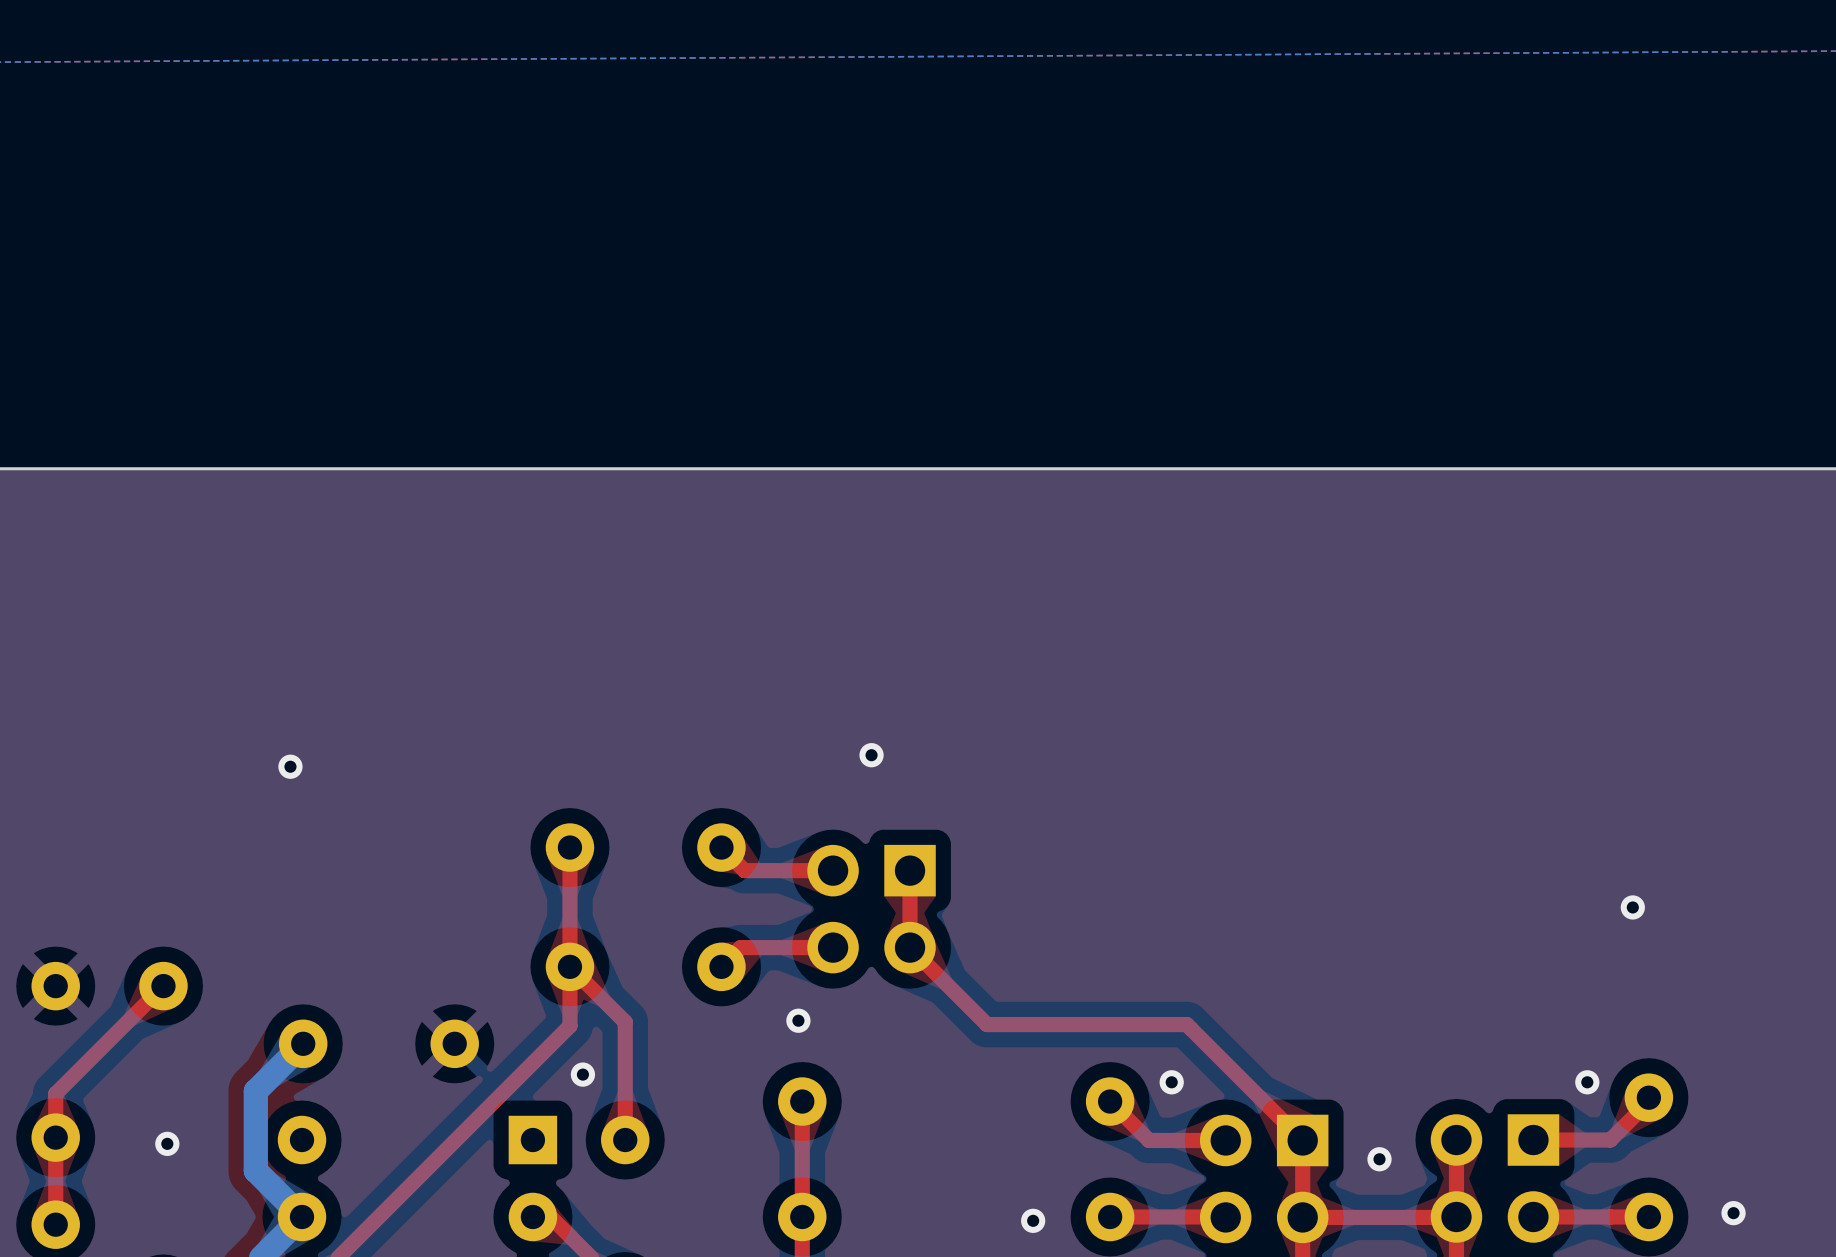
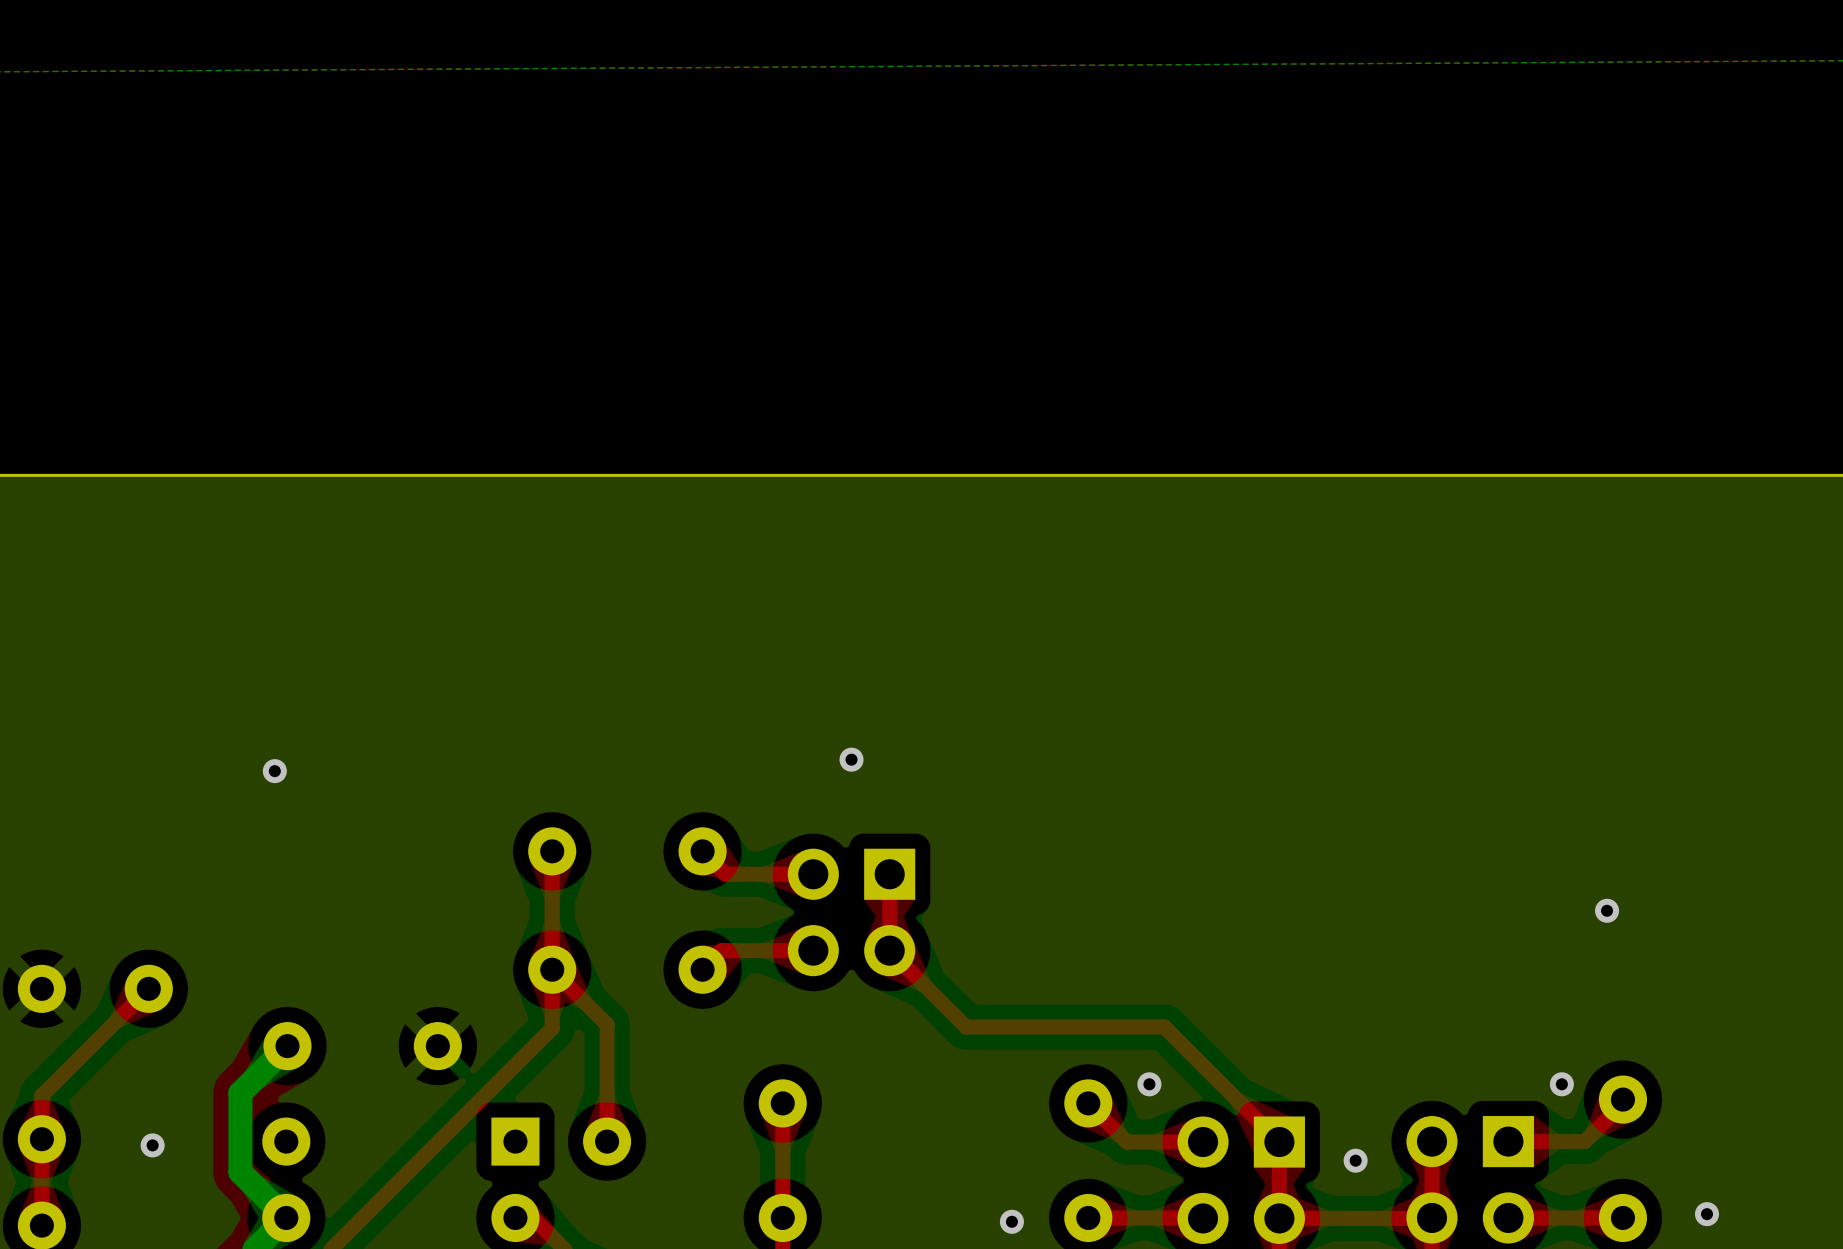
via: (798, 1020) -> none
via: (582, 1074) -> none

